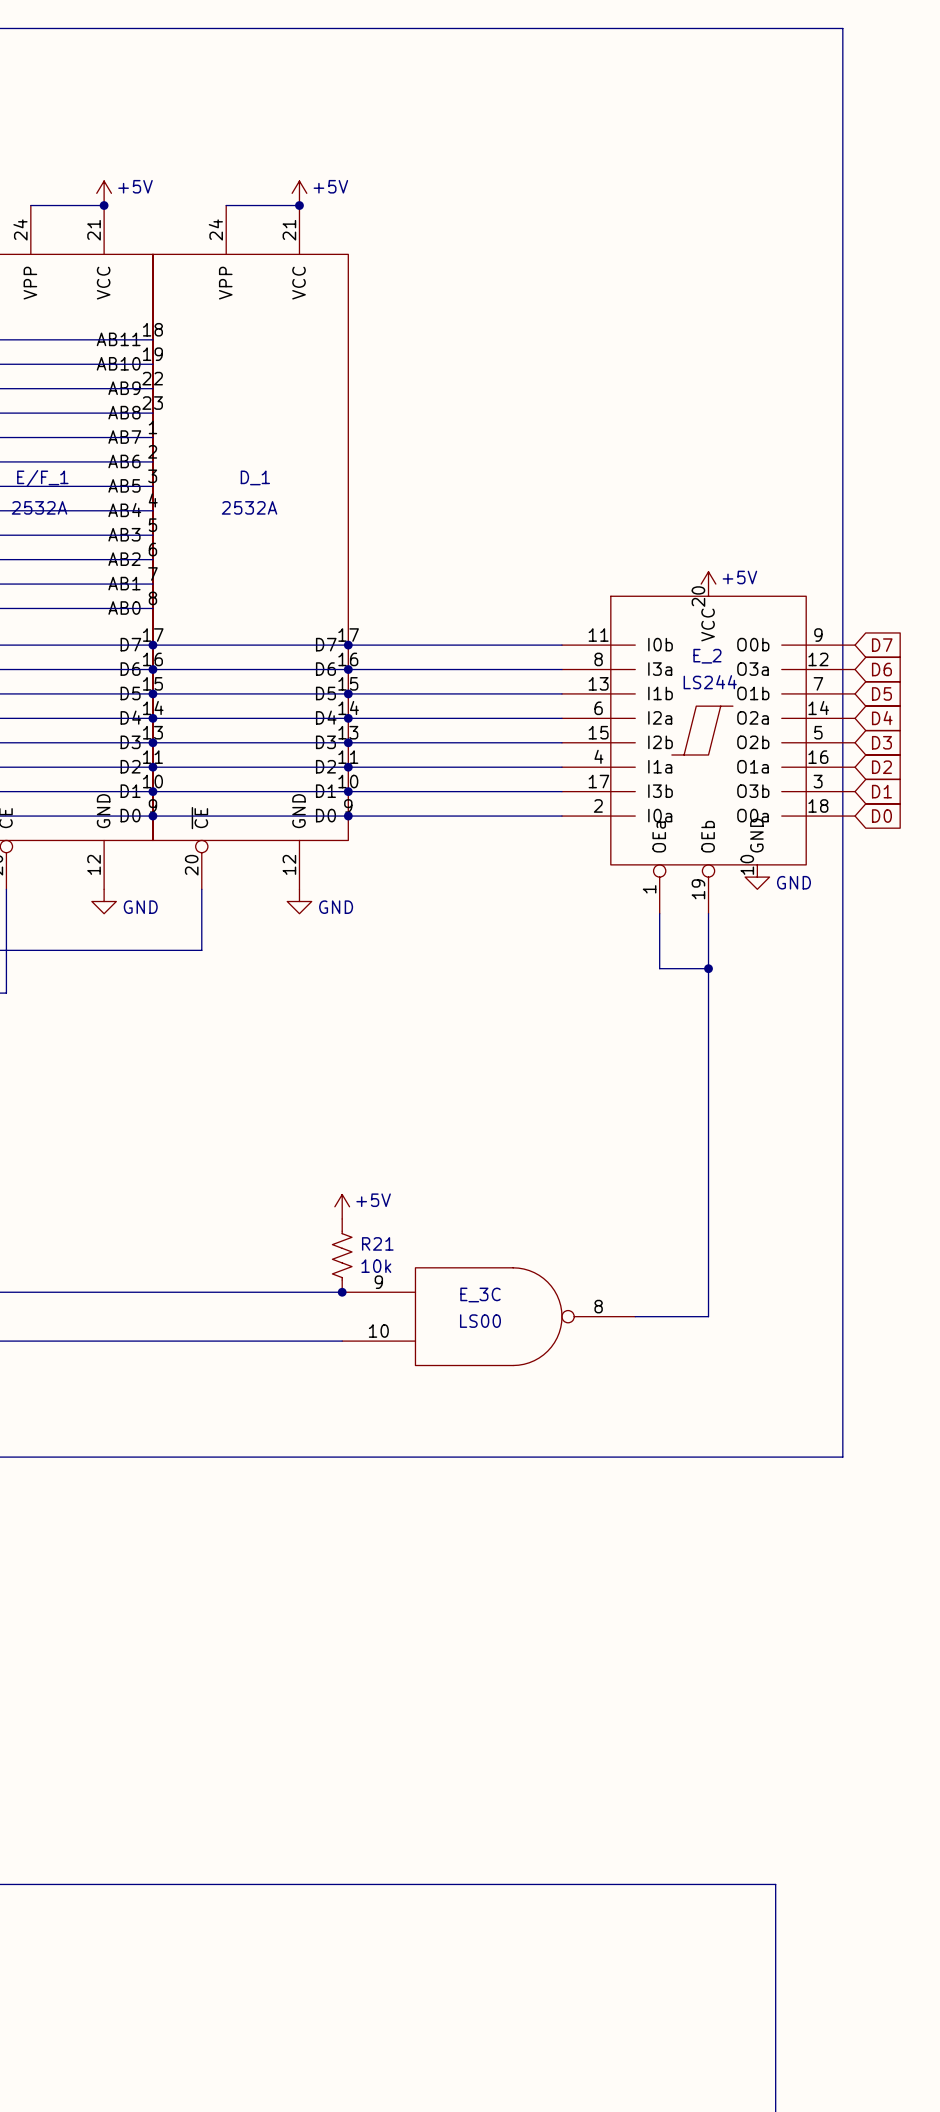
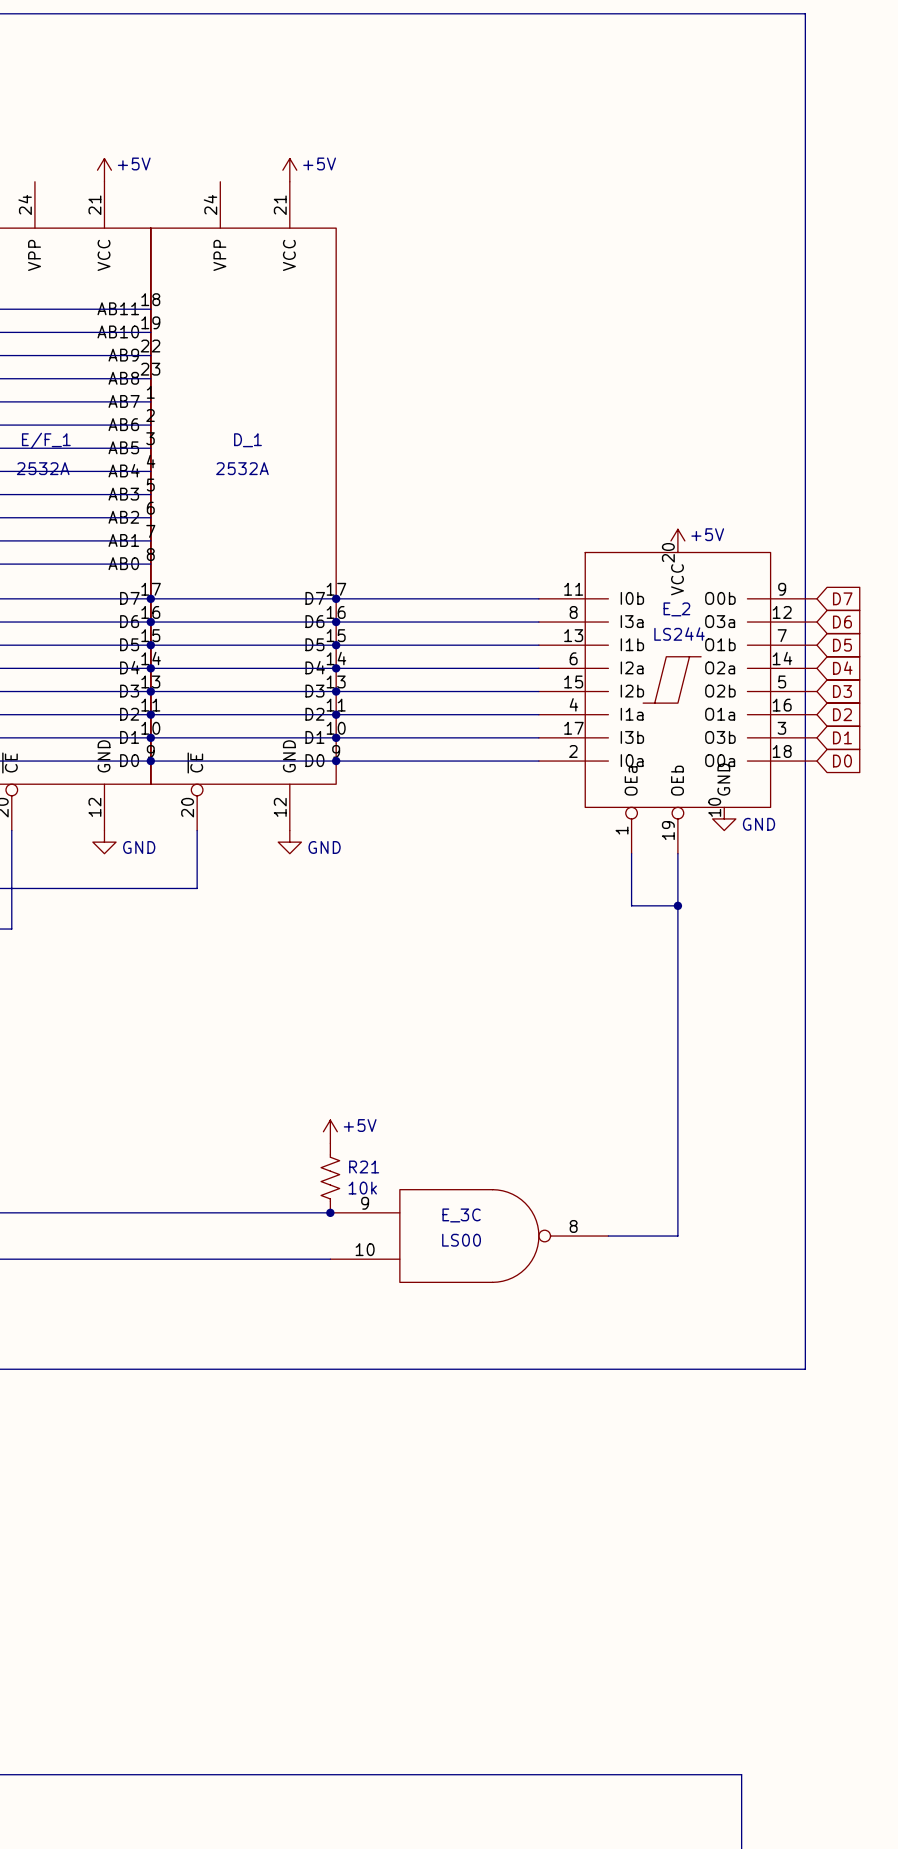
wire: (30, 205) (104, 205) -> none
junction: (104, 205) -> none
wire: (226, 205) (299, 205) -> none
junction: (299, 205) -> none

